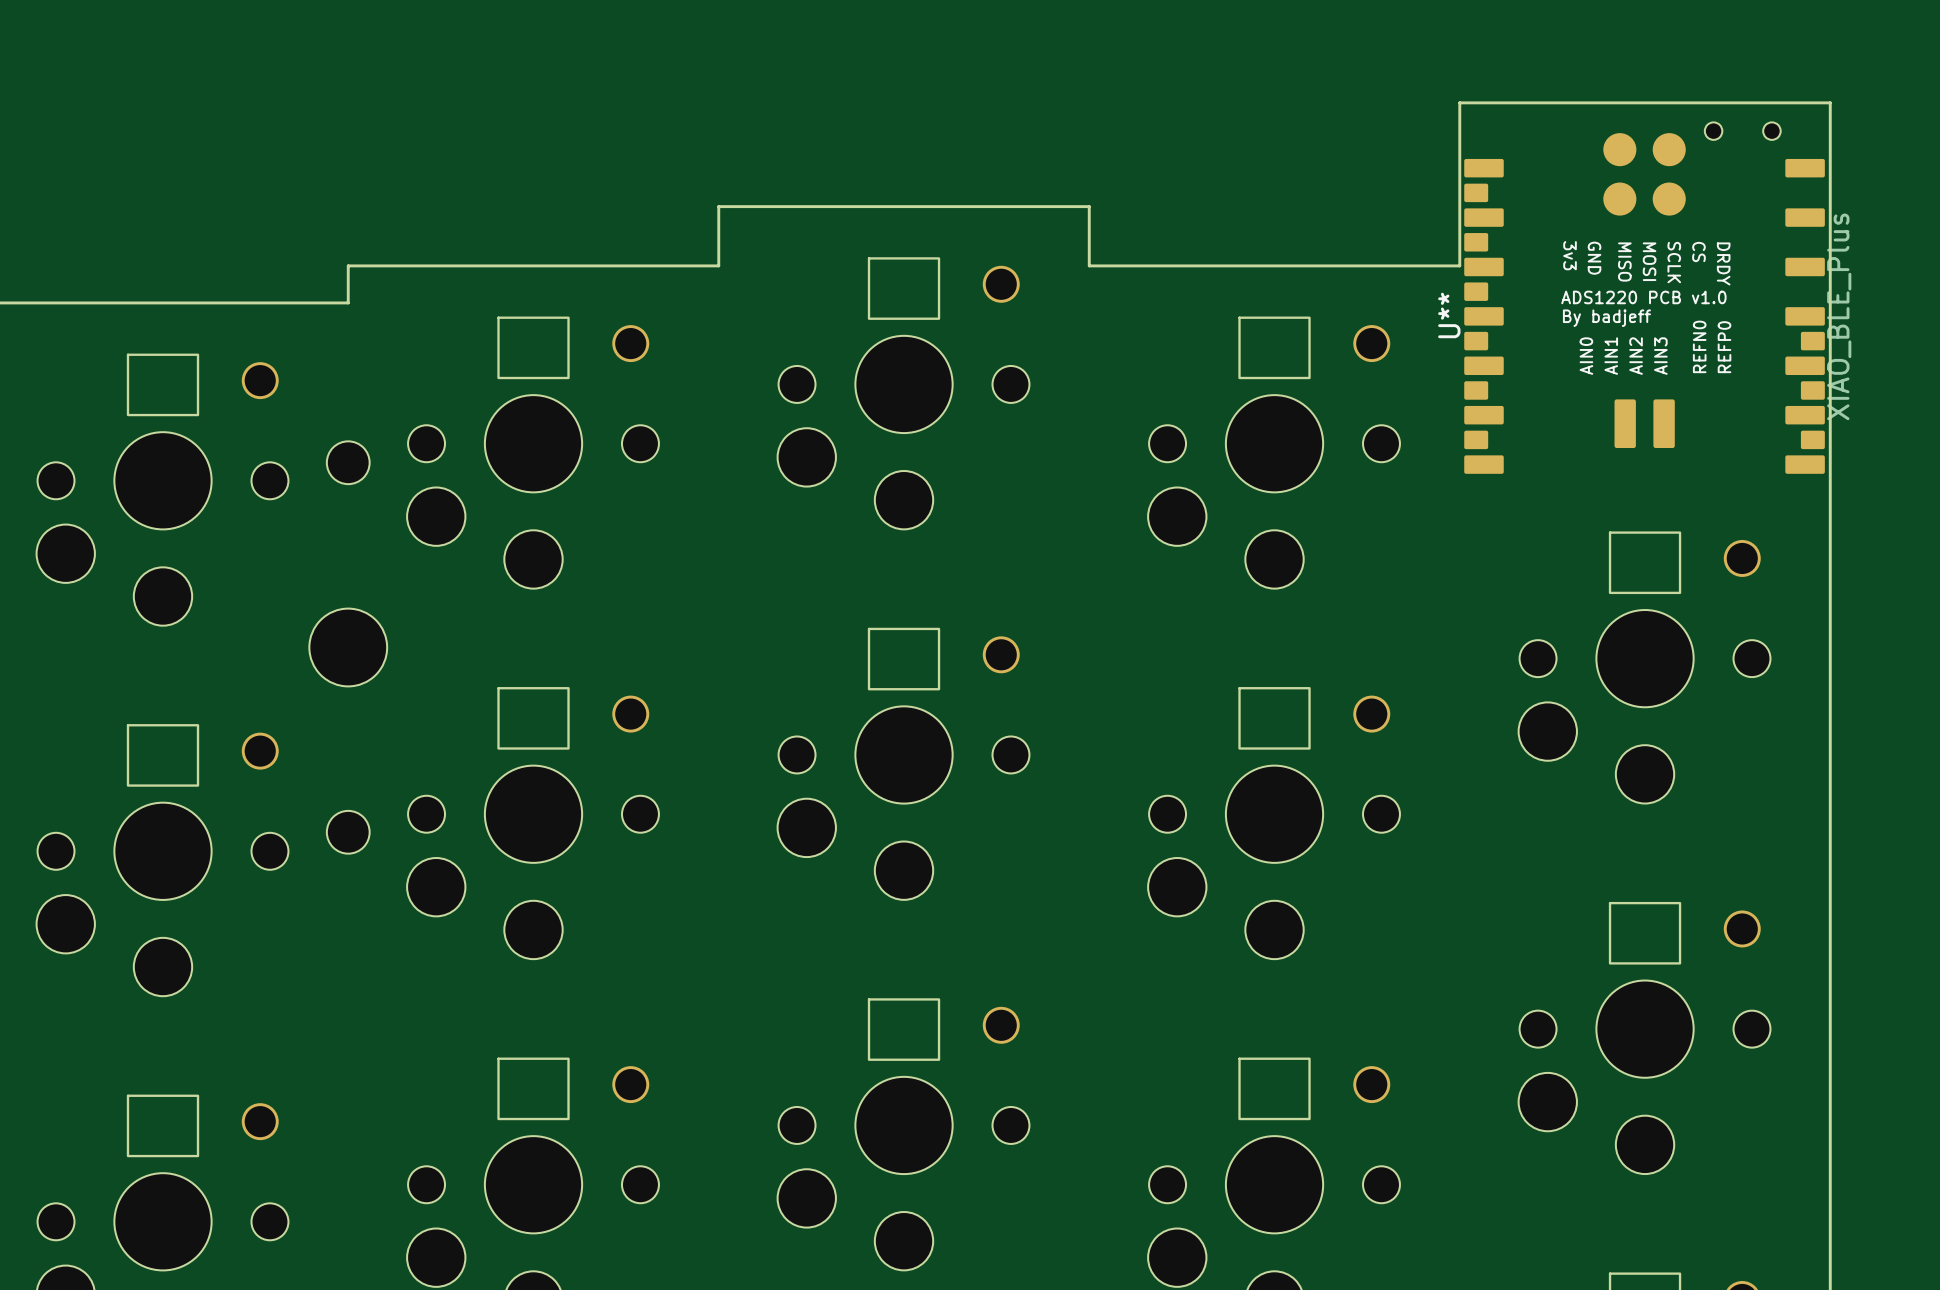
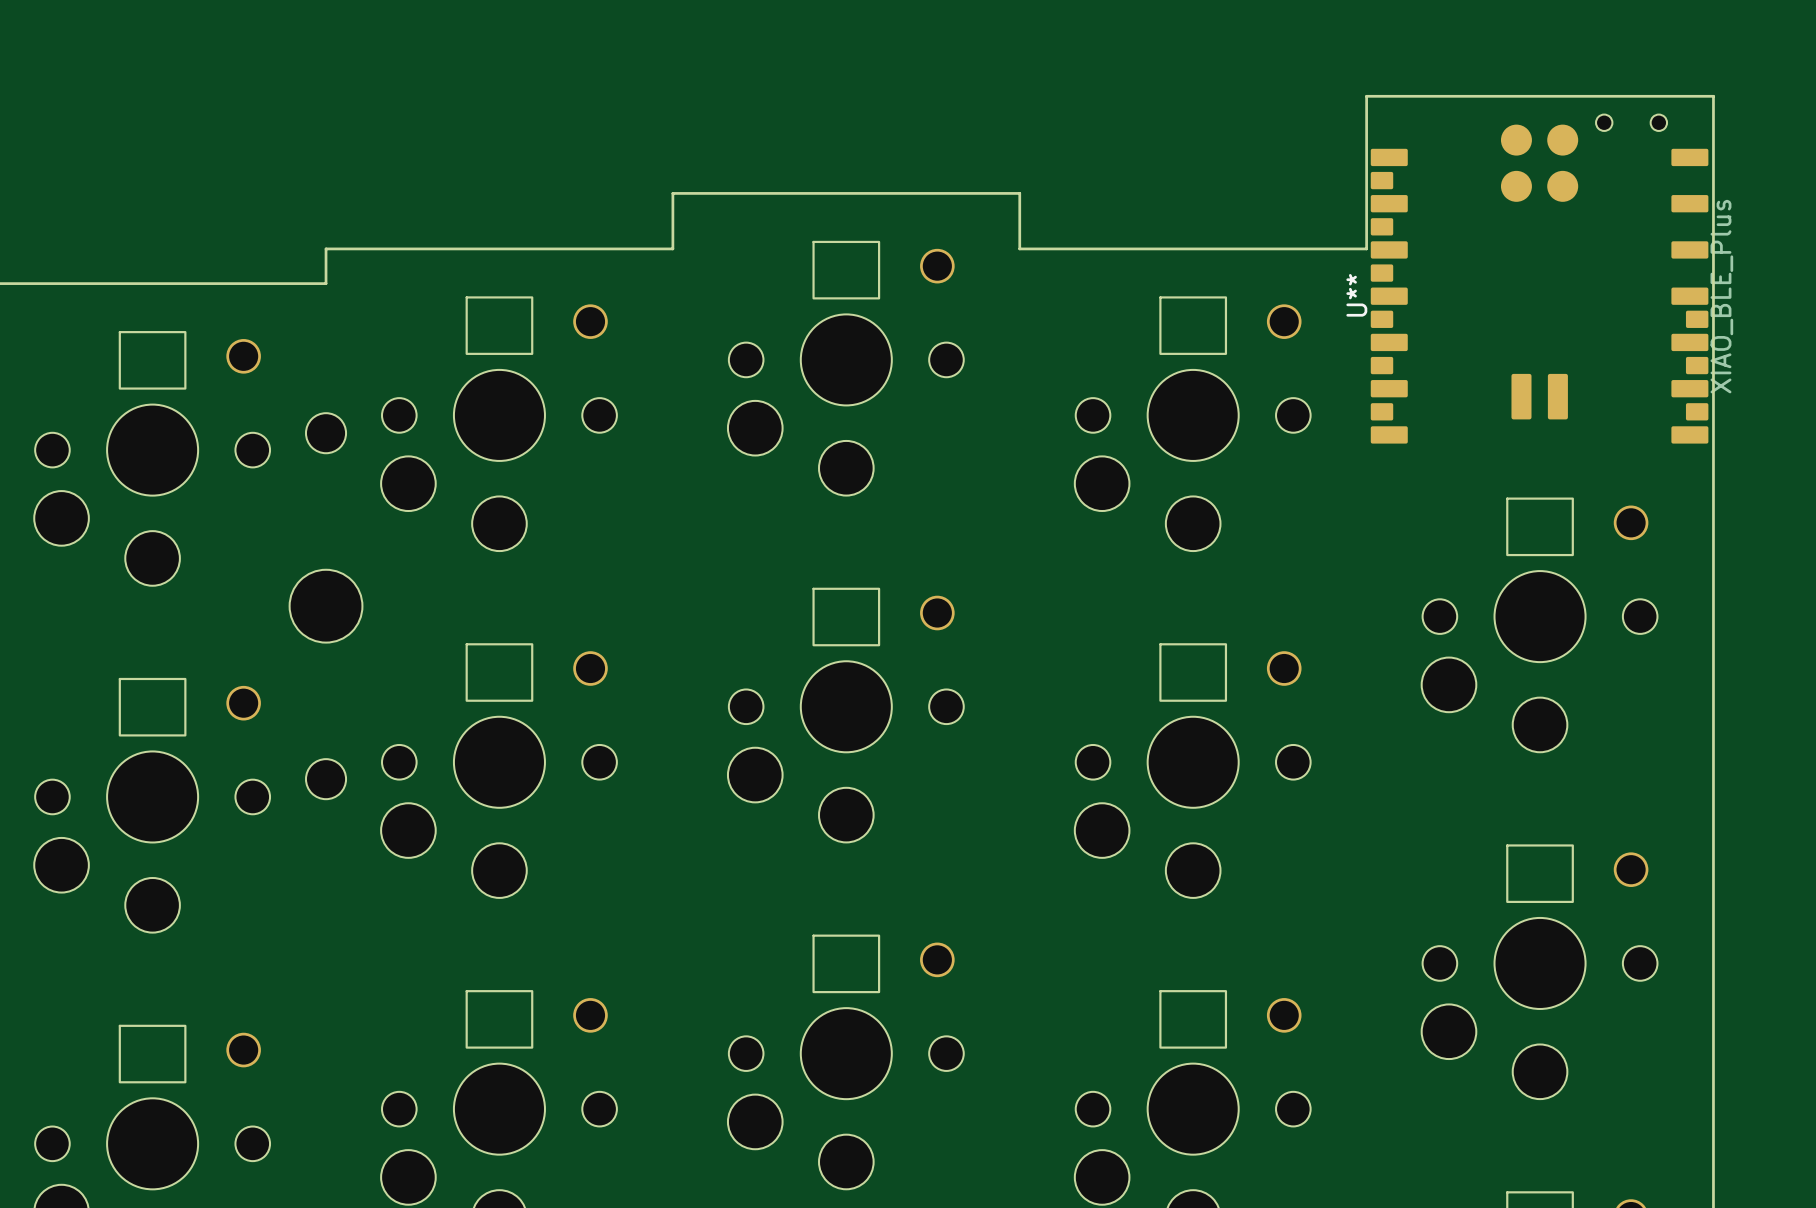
text: CS (1698, 251) -> none
text: 3v3 (1570, 255) -> none
text: GND (1594, 258) -> none
text: MOSI (1649, 261) -> none
text: MISO (1624, 262) -> none
text: SCLK (1674, 262) -> none
text: DRDY (1723, 263) -> none
text: ADS1220 PCB v1.0 (1643, 297) -> none
text: By badjeff (1606, 318) -> none
text: REFN0 (1699, 346) -> none
text: REFP0 (1724, 347) -> none
text: AIN0 (1586, 356) -> none
text: AIN1 (1611, 356) -> none
text: AIN2 (1636, 356) -> none
text: AIN3 (1660, 356) -> none

